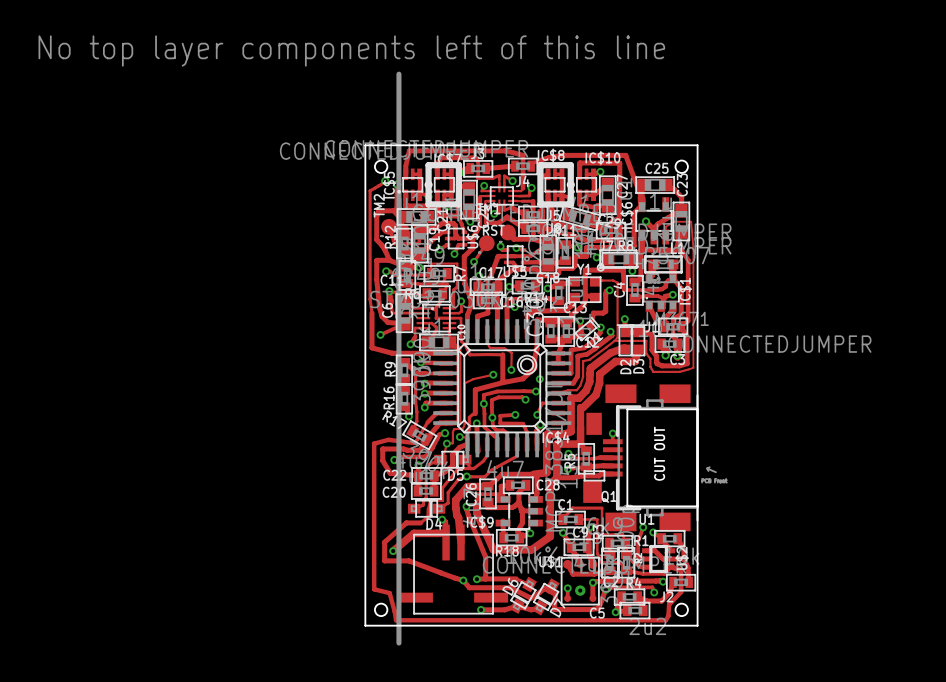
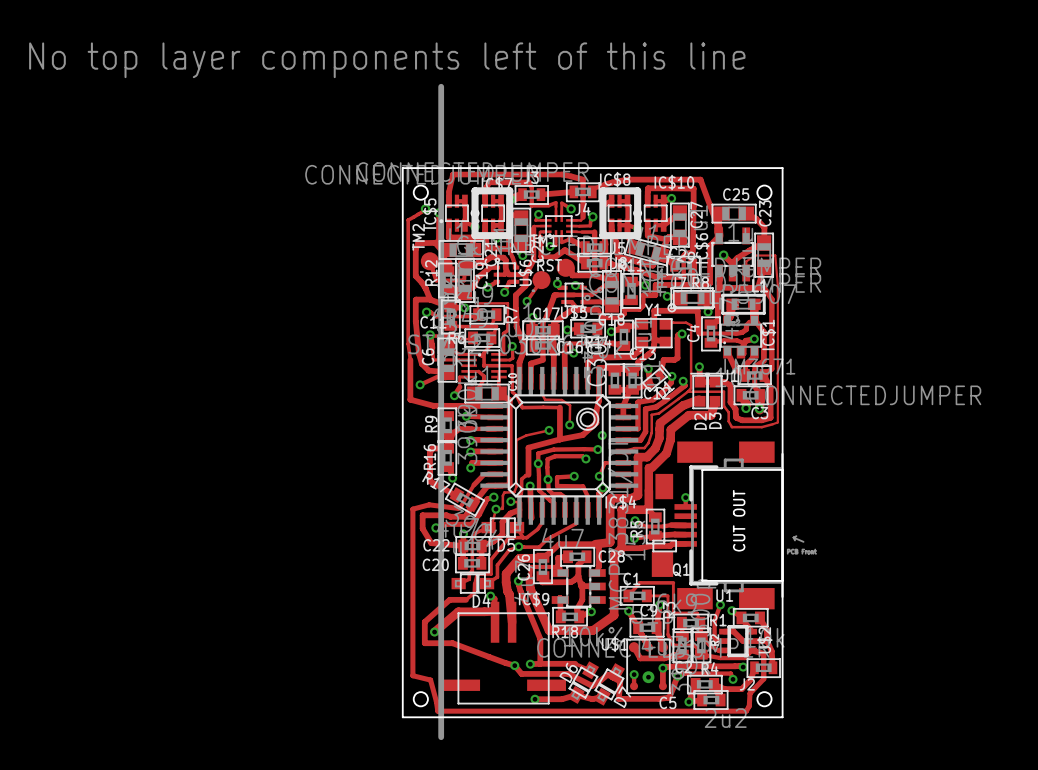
track: (404, 362) (415, 373) (416, 421) (412, 431) -> (460, 429) (452, 433) (447, 448) (432, 448) (429, 452) (430, 481) (456, 495)

